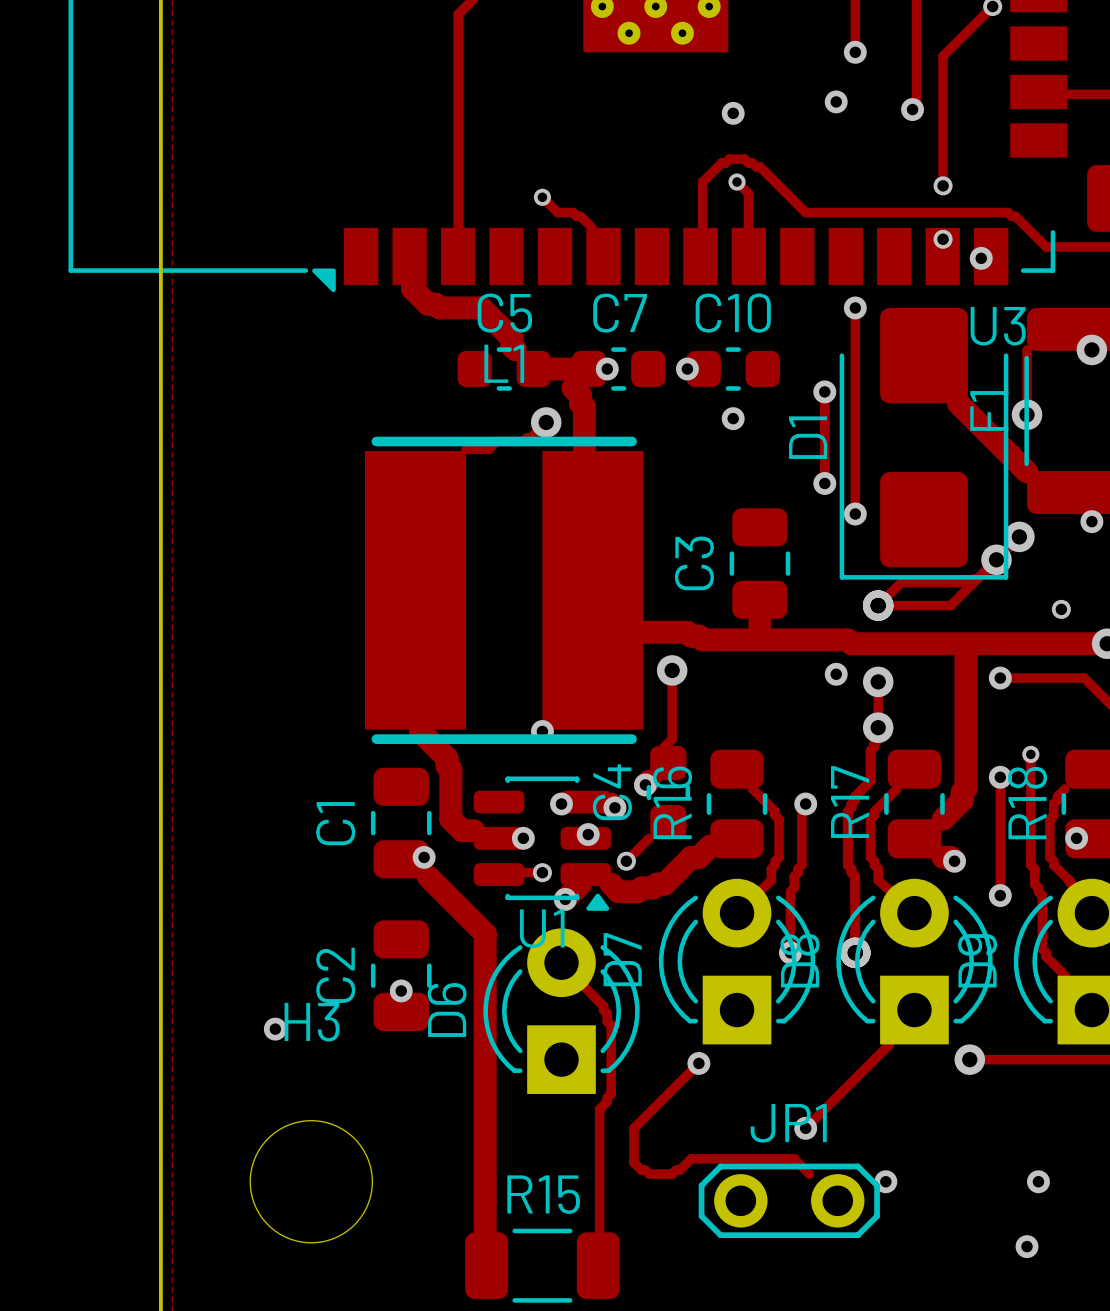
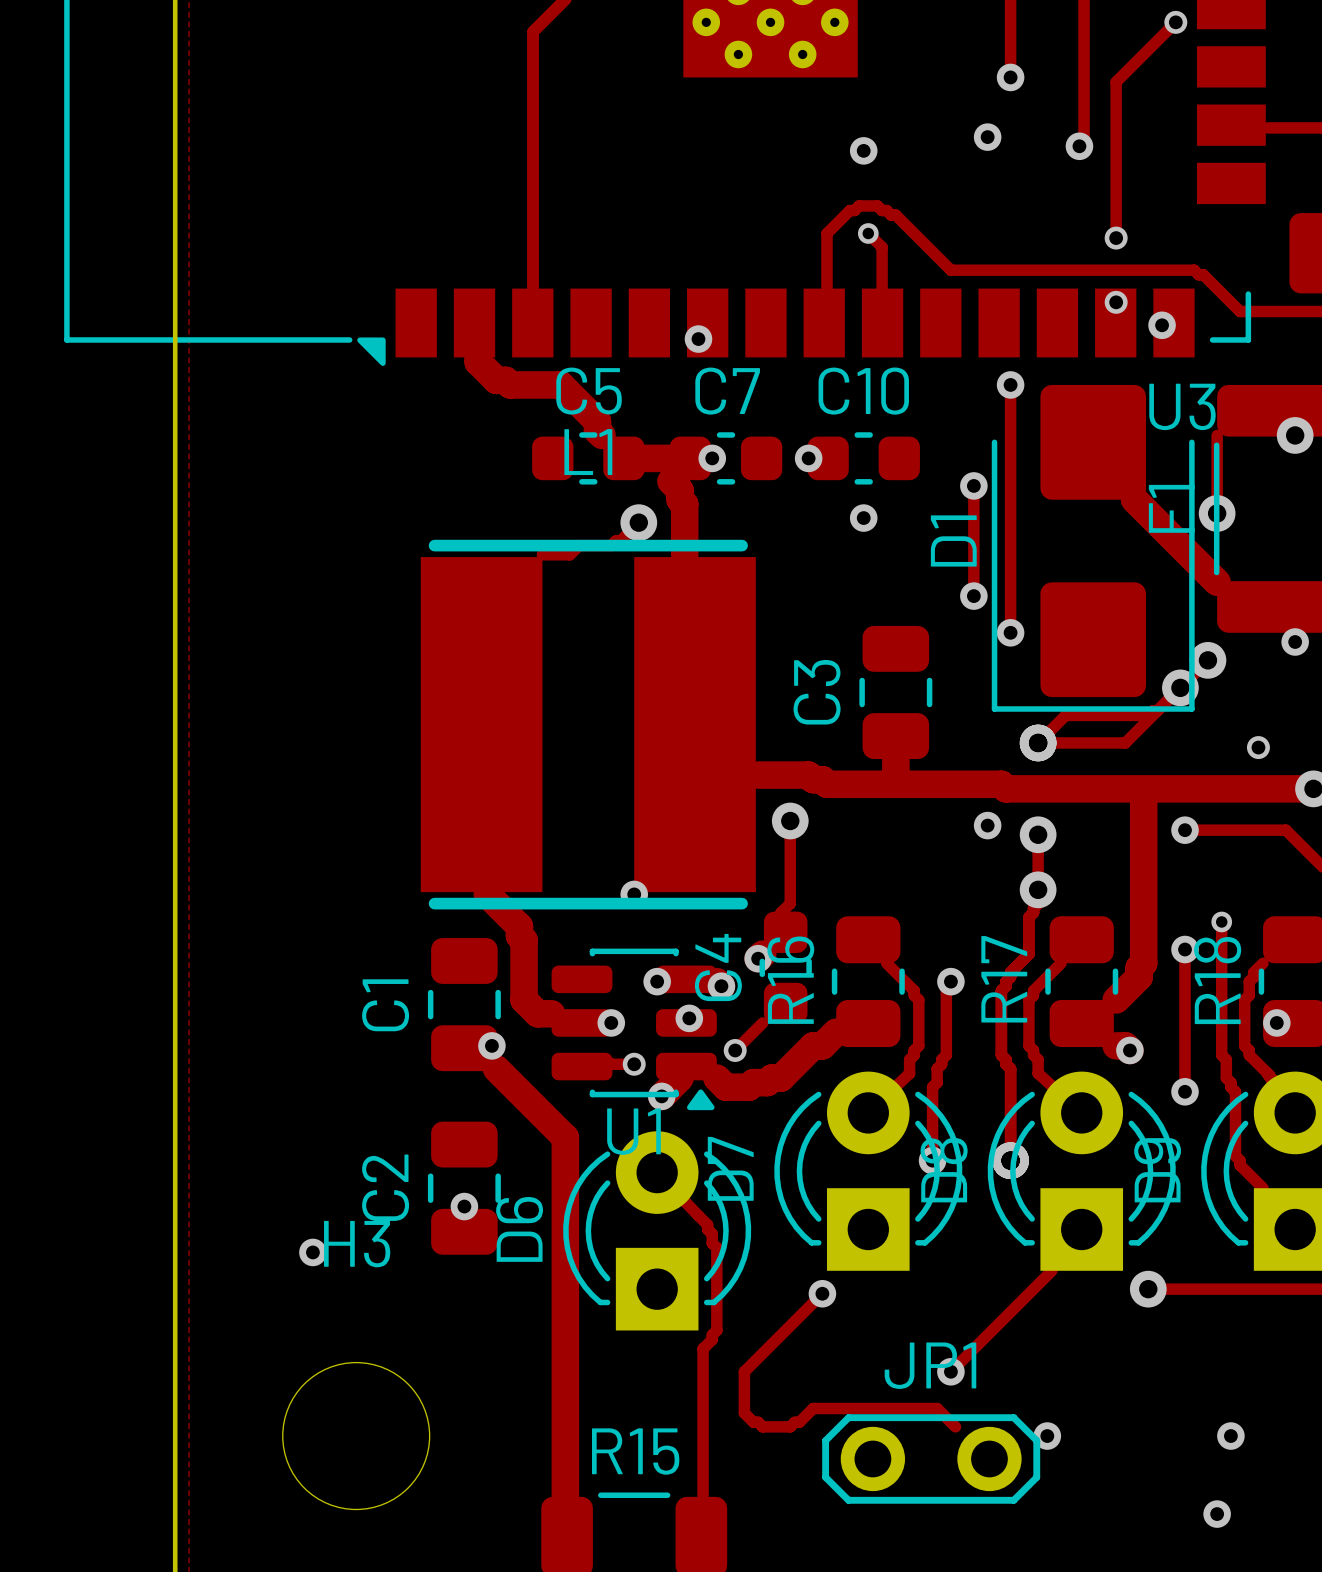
track: (542, 197) (557, 212) (572, 212) (576, 216) (580, 216) (592, 227) -> none
via: (542, 197) -> none
via: none -> (698, 339)

